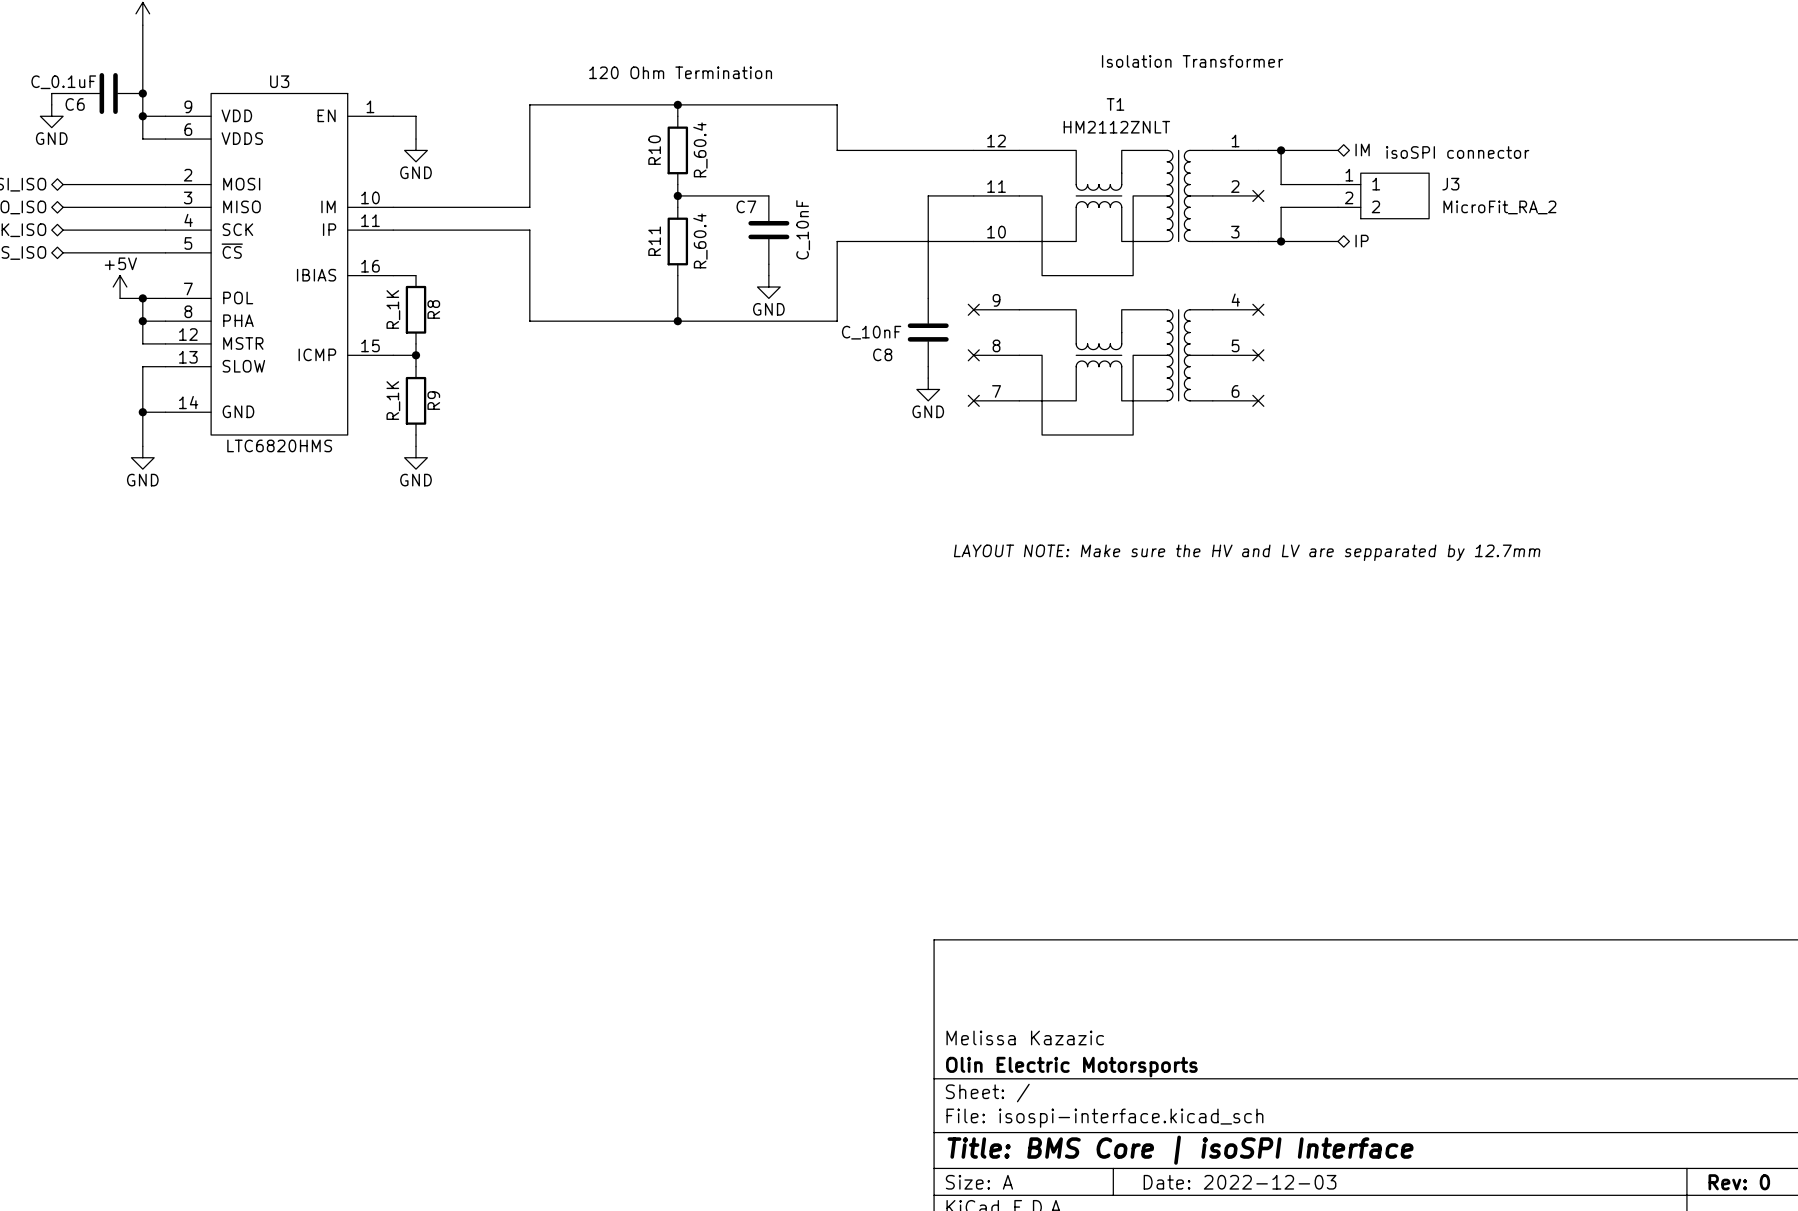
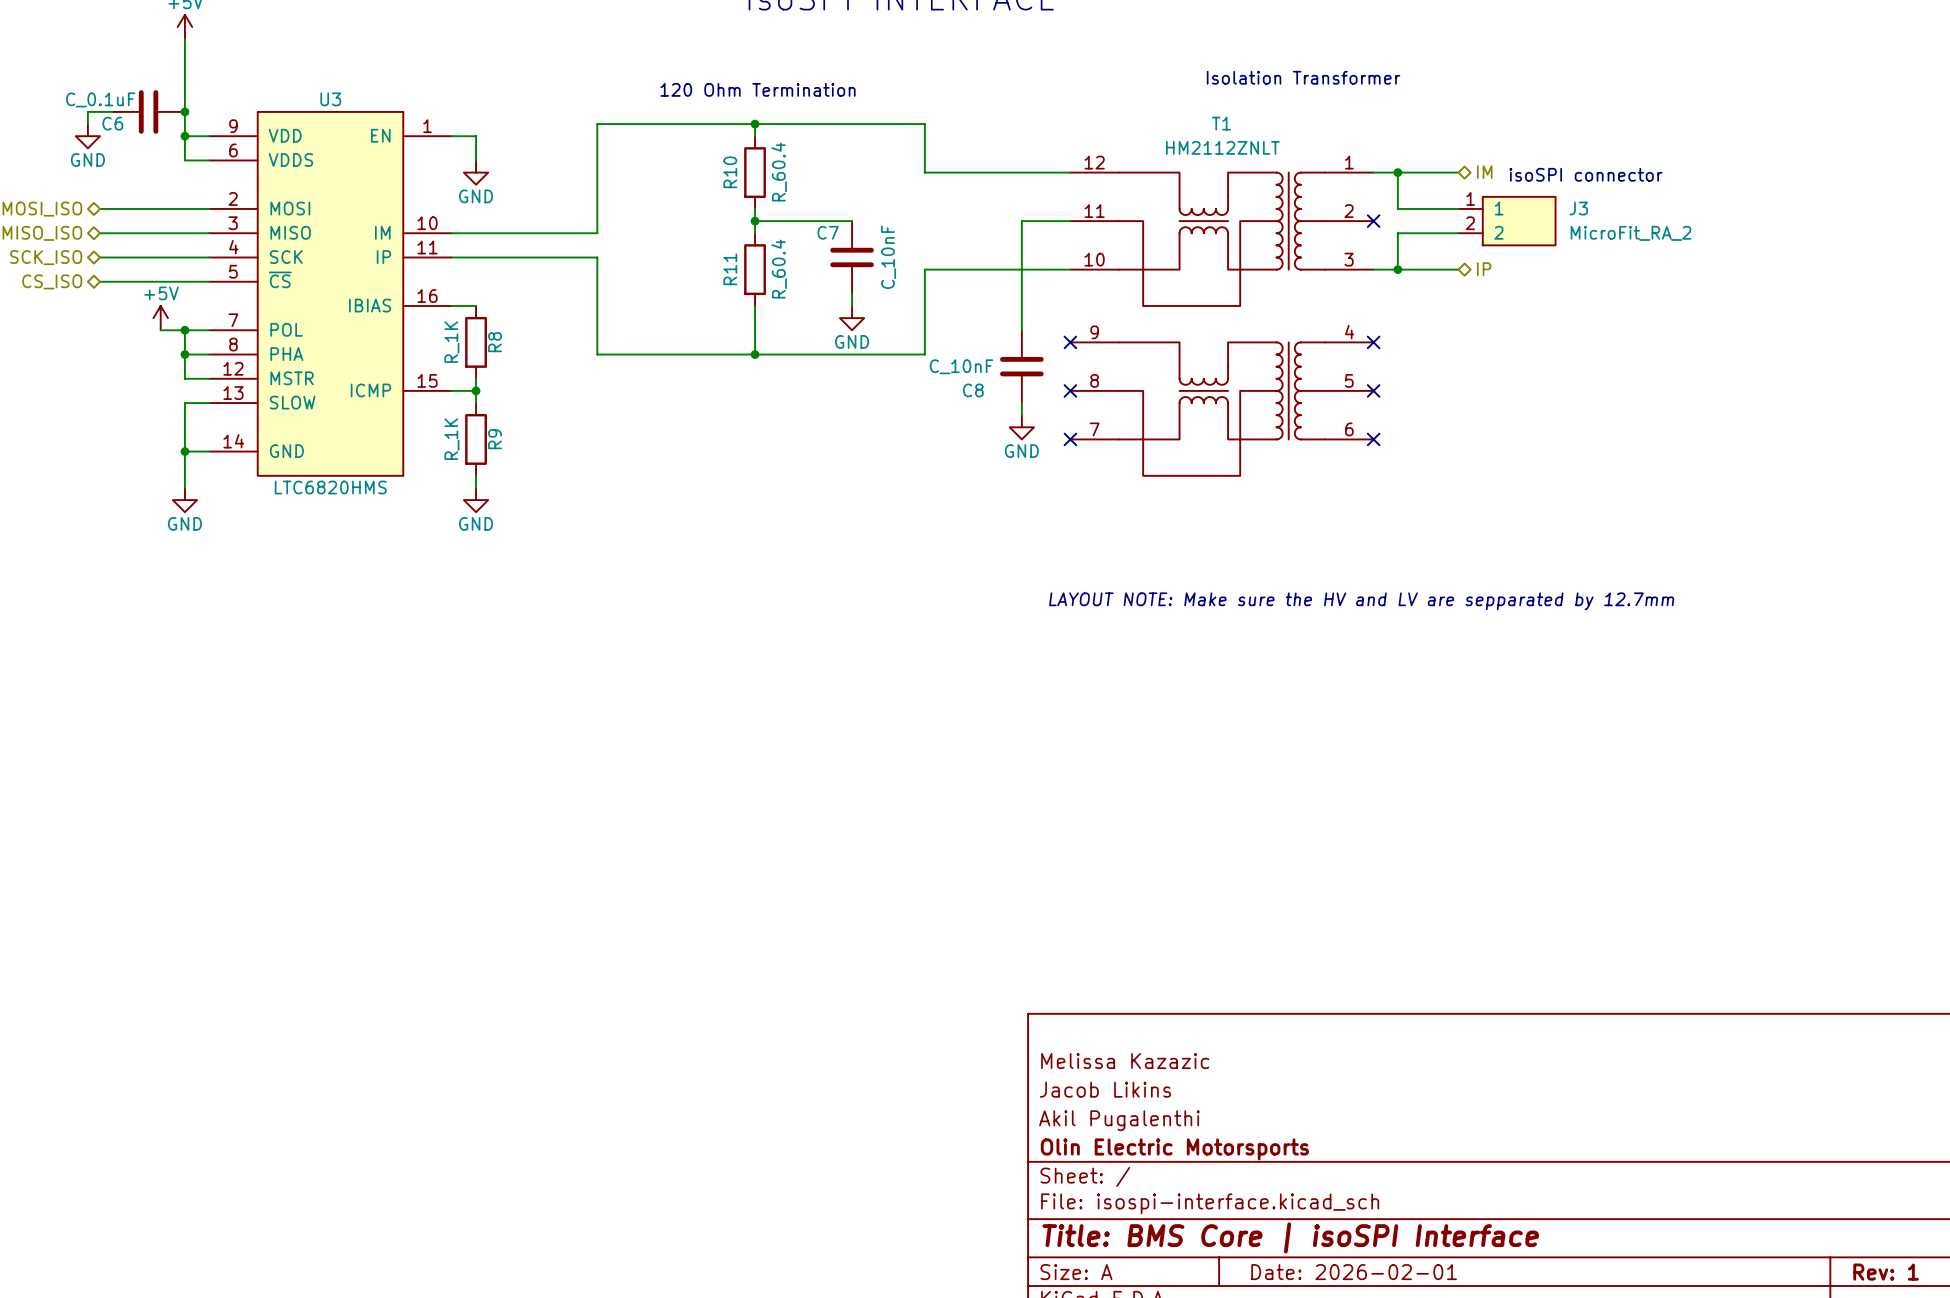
title block: none -> Melissa Kazazic (1125, 1061)
title block: none -> Jacob Likins (1105, 1089)
title block: Melissa Kazazic (1025, 1037) -> Akil Pugalenthi (1119, 1120)
title block: Date: 2022-12-03 (1240, 1182) -> Date: 2026-02-01 (1354, 1272)
title block: Rev: 0 (1739, 1182) -> Rev: 1 (1886, 1272)

